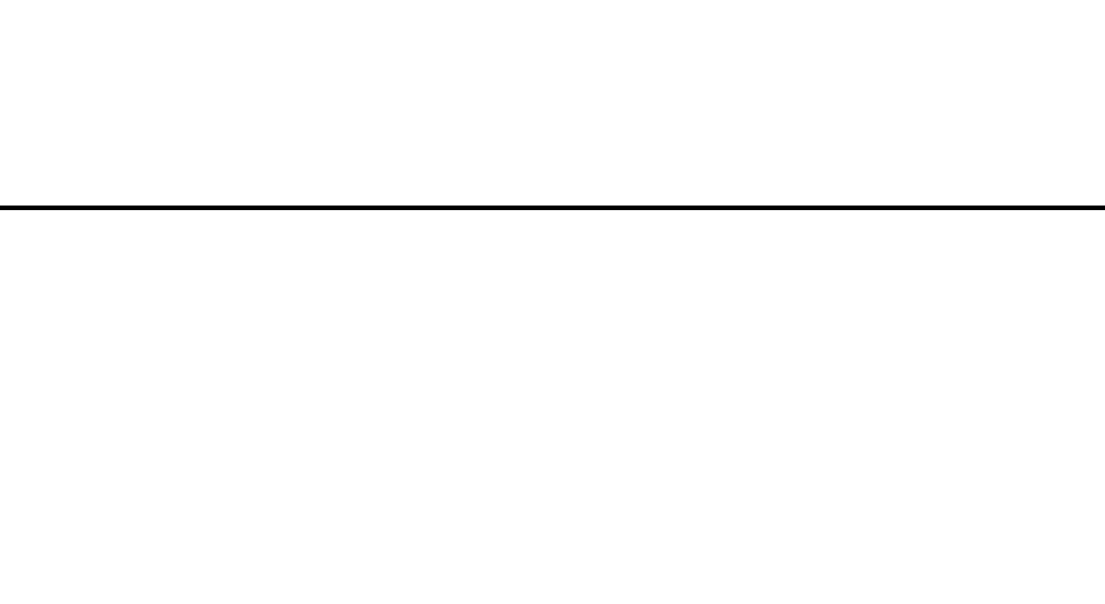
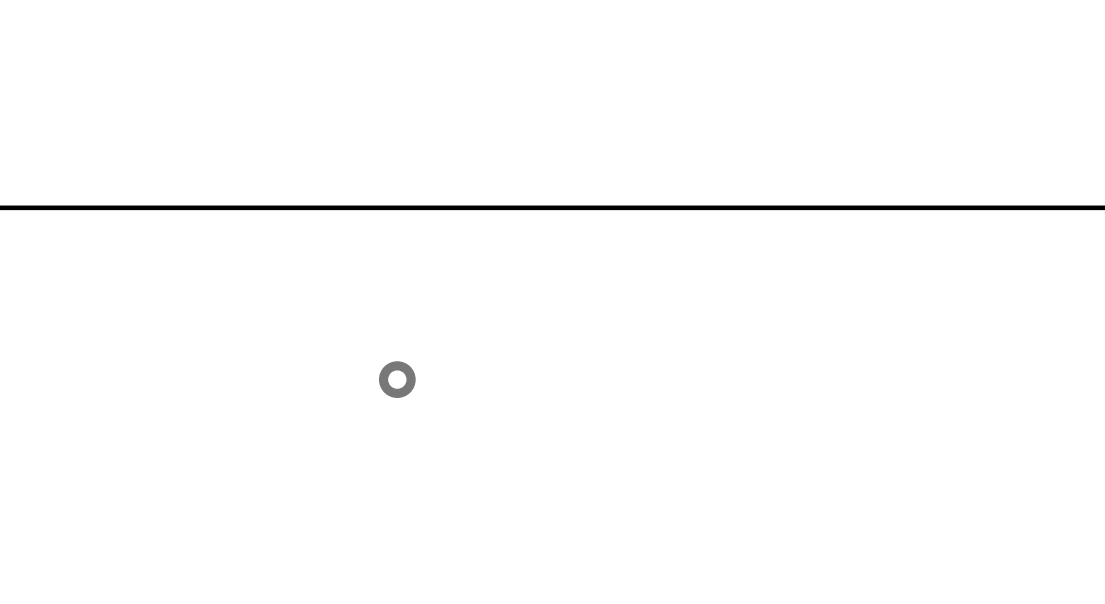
via: none -> (397, 379)

